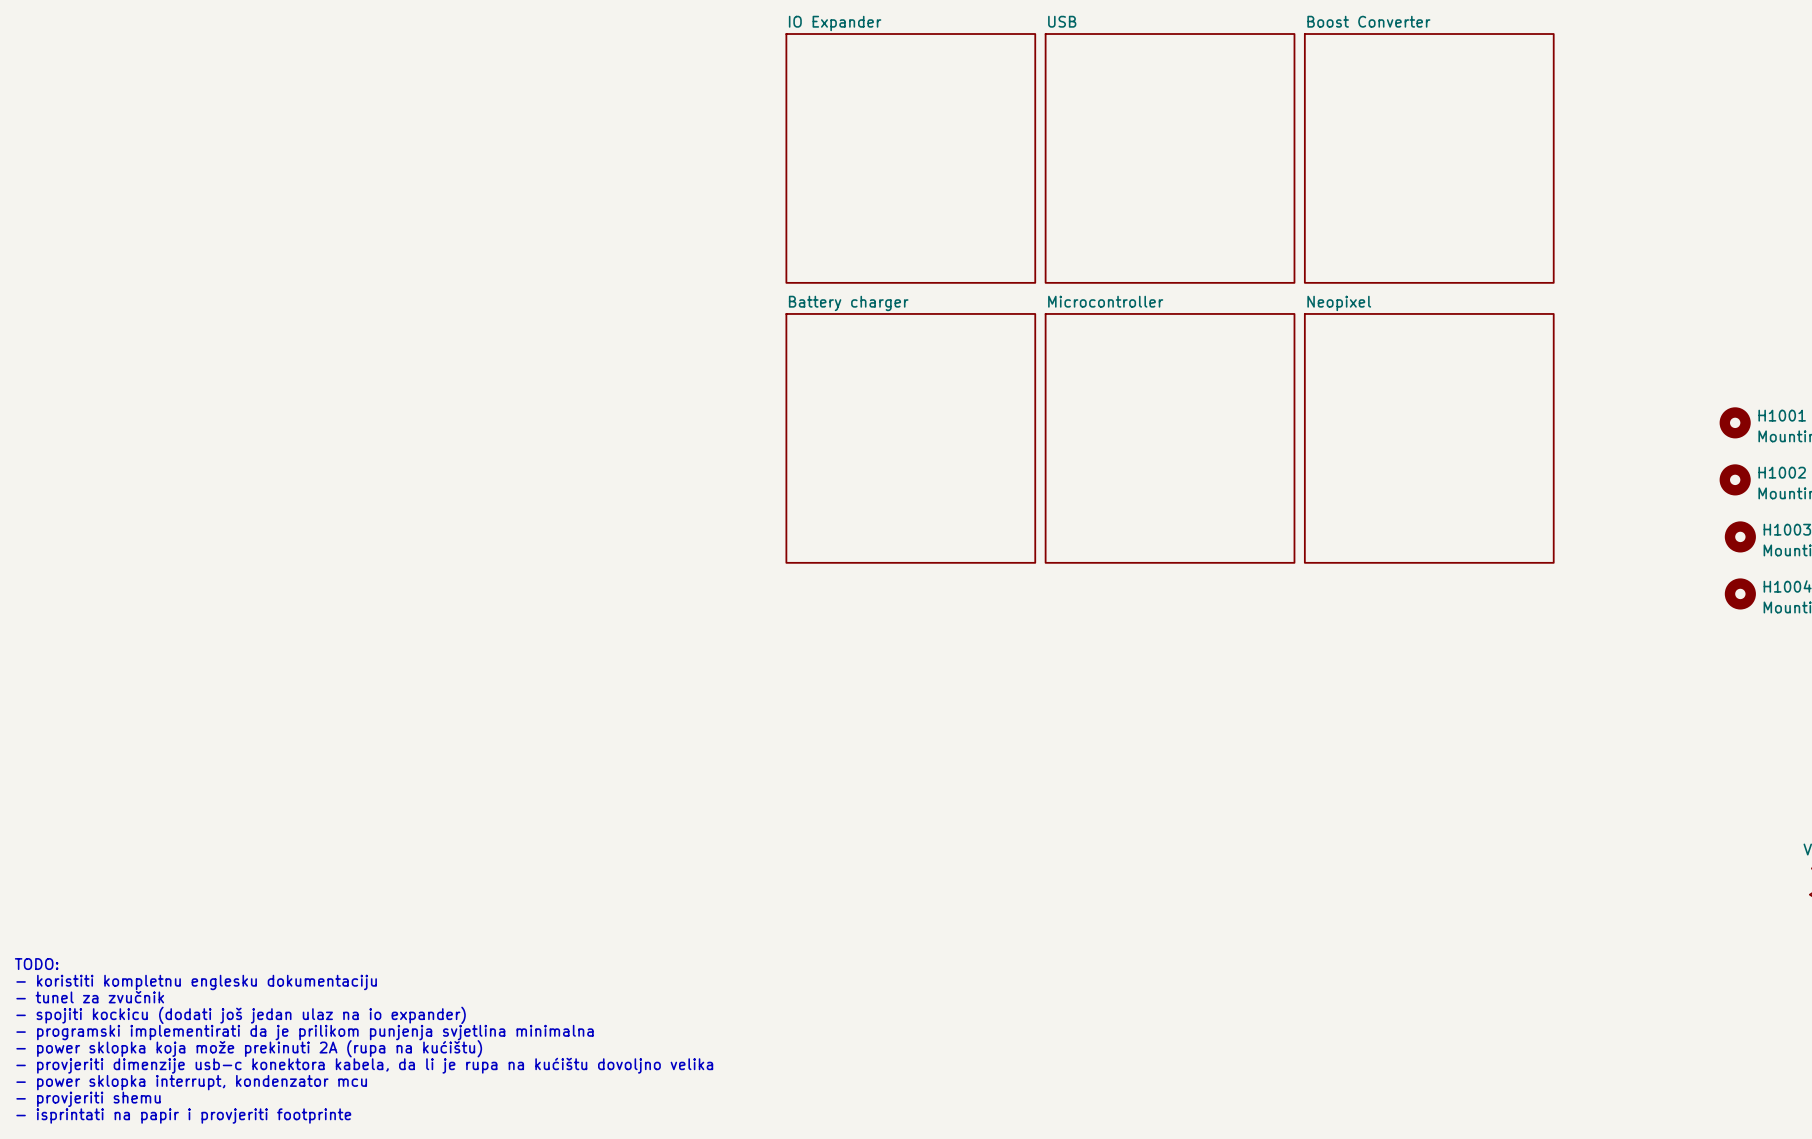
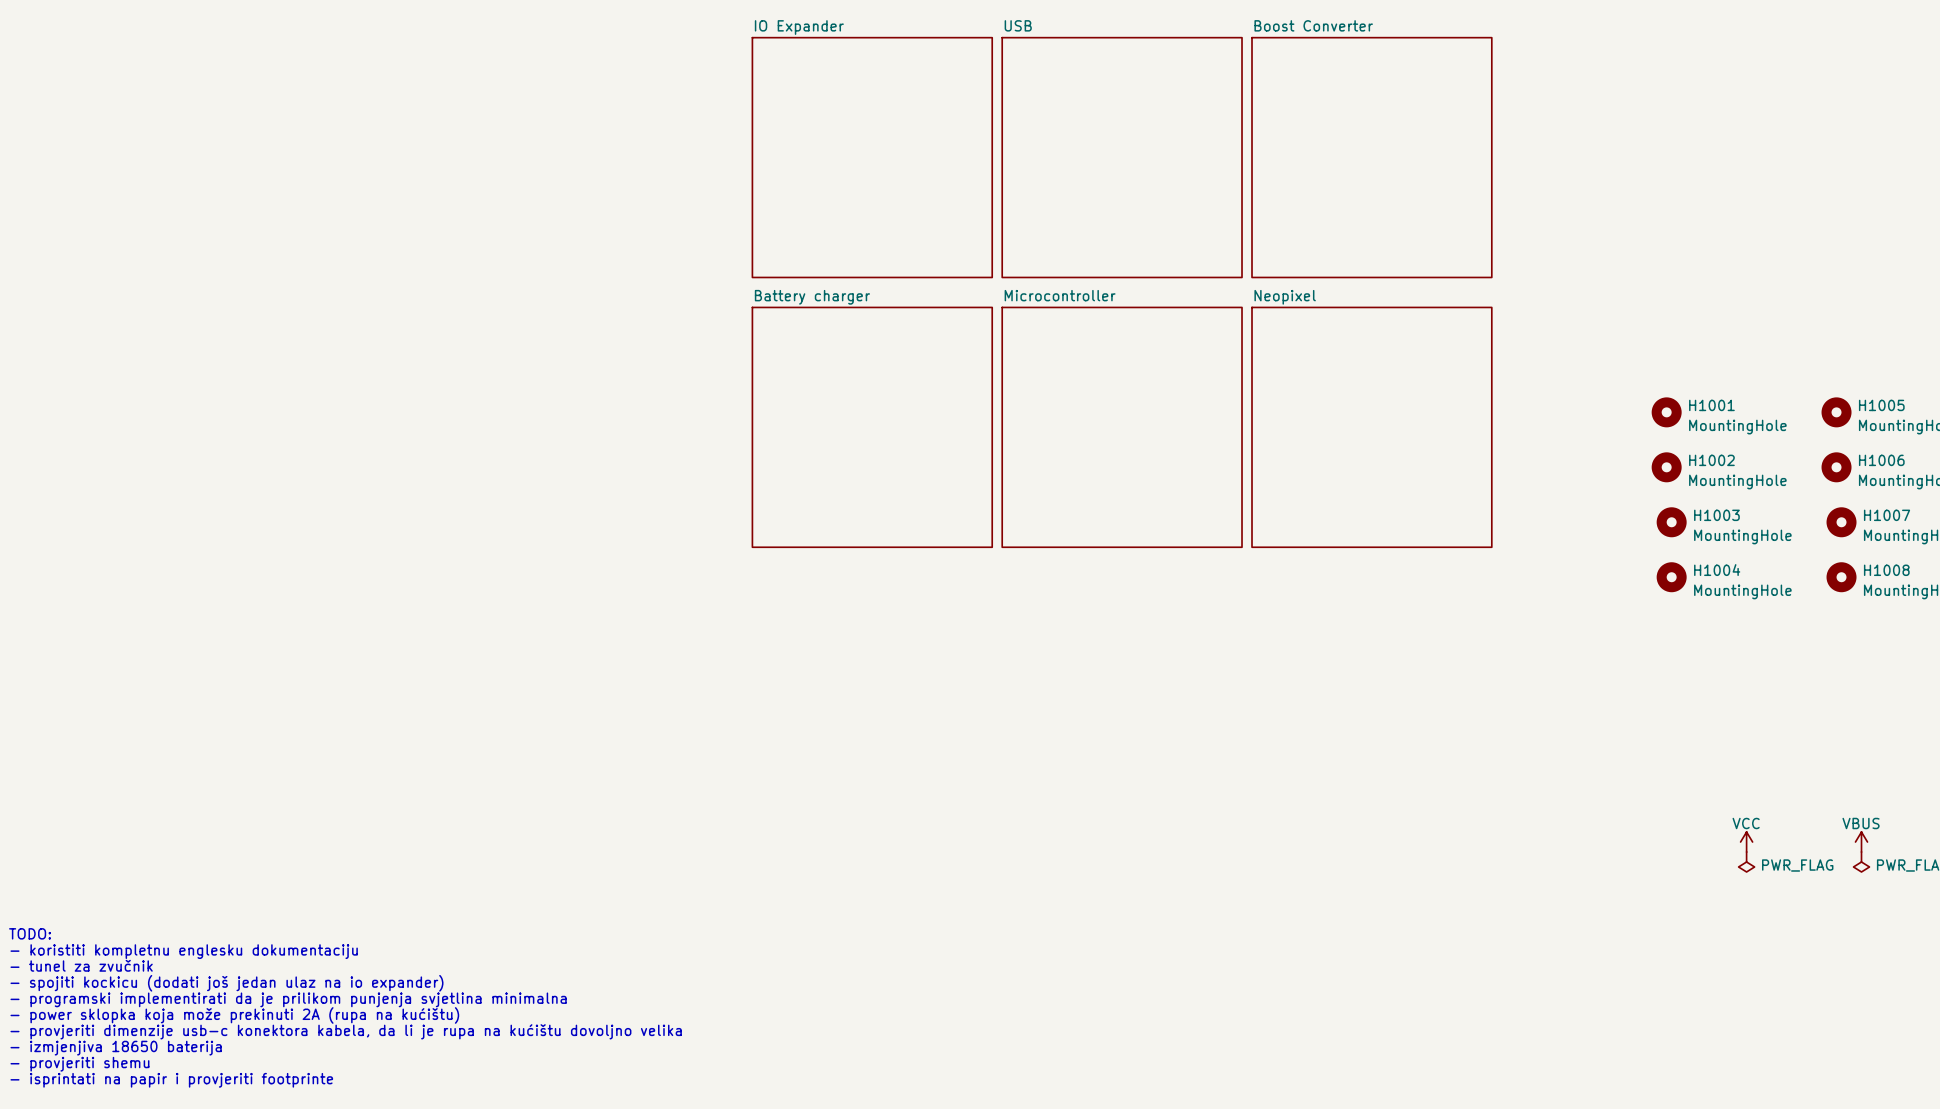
text: - power sklopka interrupt, kondenzator mcu (191, 1082) -> - izmjenjiva 18650 baterija (116, 1048)

